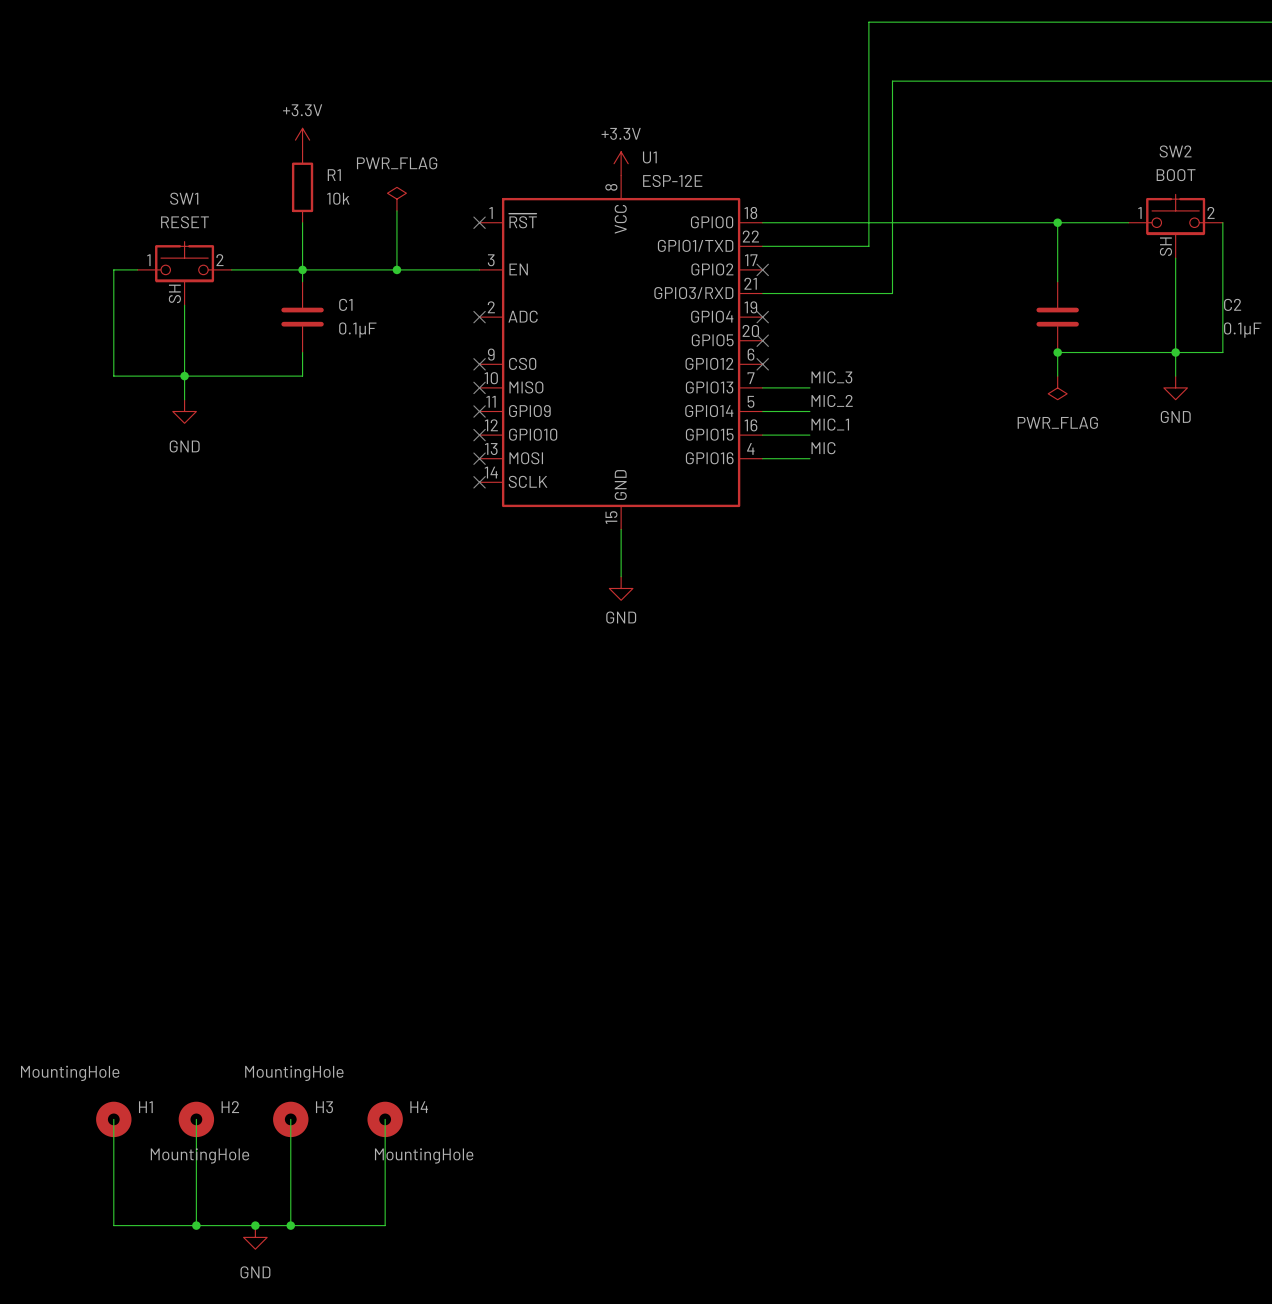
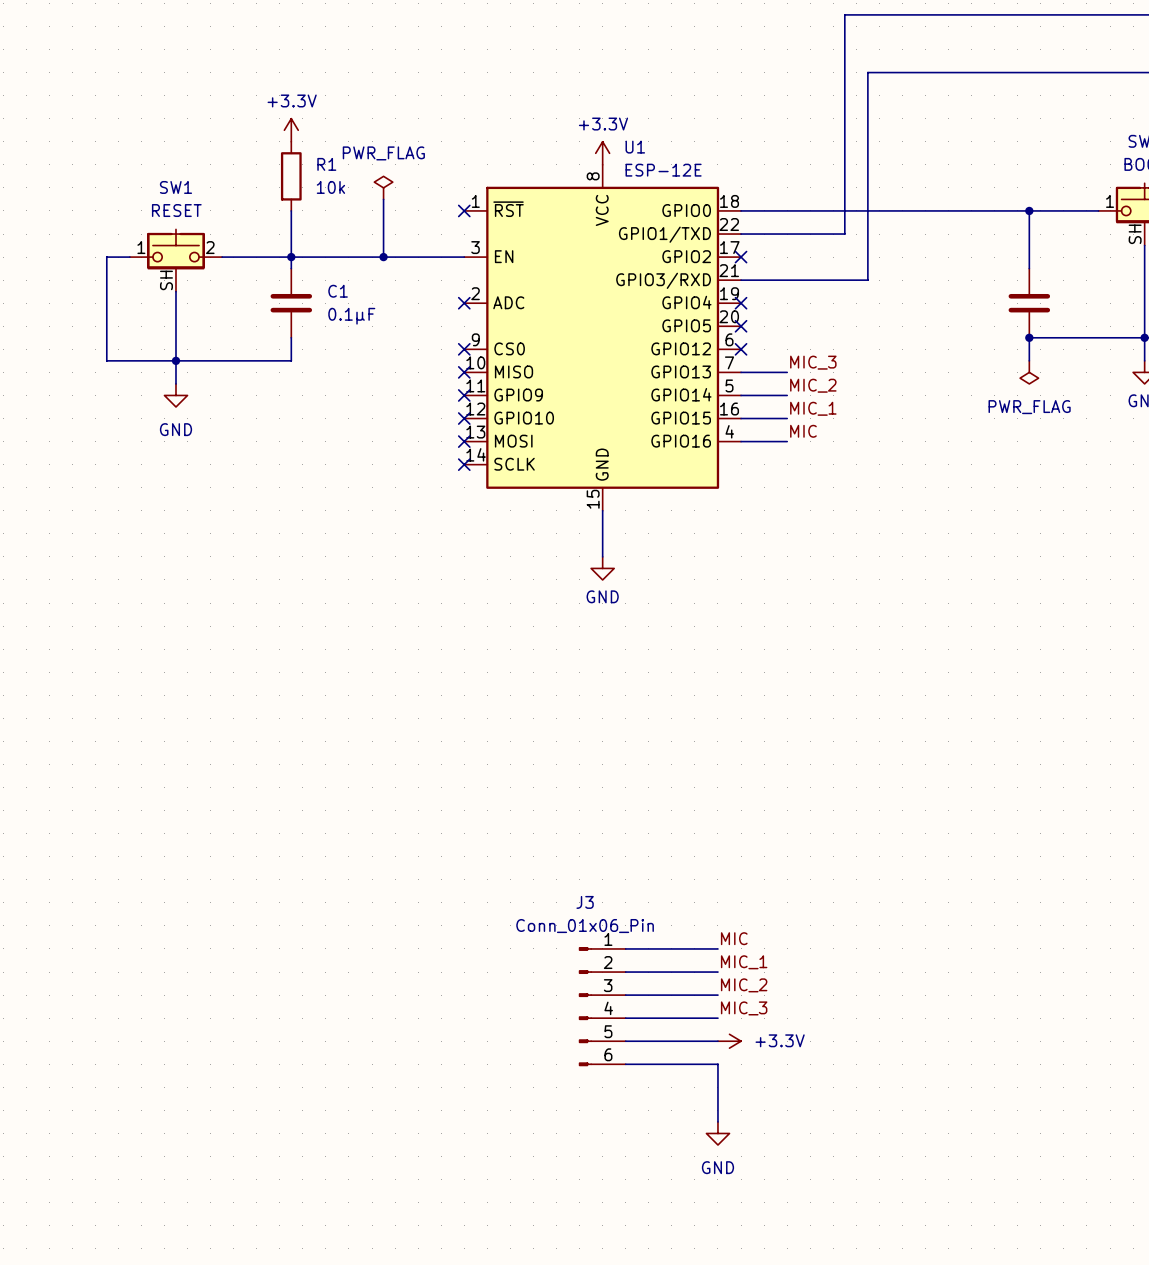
label: none -> MIC (734, 938)
wire: none -> (625, 948) (717, 948)
label: none -> MIC_1 (744, 962)
wire: none -> (625, 972) (717, 972)
label: none -> MIC_2 (744, 985)
wire: none -> (625, 995) (717, 995)
J3: none -> Conn_01x06_Pin (602, 1006)
label: none -> MIC_3 (744, 1008)
wire: none -> (625, 1018) (717, 1018)
wire: none -> (625, 1041) (717, 1041)
power symbol: none -> +3.3V (729, 1041)
wire: none -> (625, 1064) (717, 1064) (717, 1121)
wire: (113, 1119) (113, 1225) (385, 1225) (385, 1119) -> none
H1: MountingHole (113, 1119) -> none
wire: (196, 1119) (196, 1225) -> none
H2: MountingHole (196, 1119) -> none
wire: (290, 1119) (290, 1225) -> none
H3: MountingHole (290, 1119) -> none
H4: MountingHole (385, 1119) -> none
power symbol: none -> GND (717, 1133)
junction: (196, 1225) -> none
junction: (255, 1225) -> none
junction: (290, 1225) -> none
power symbol: GND (255, 1237) -> none

